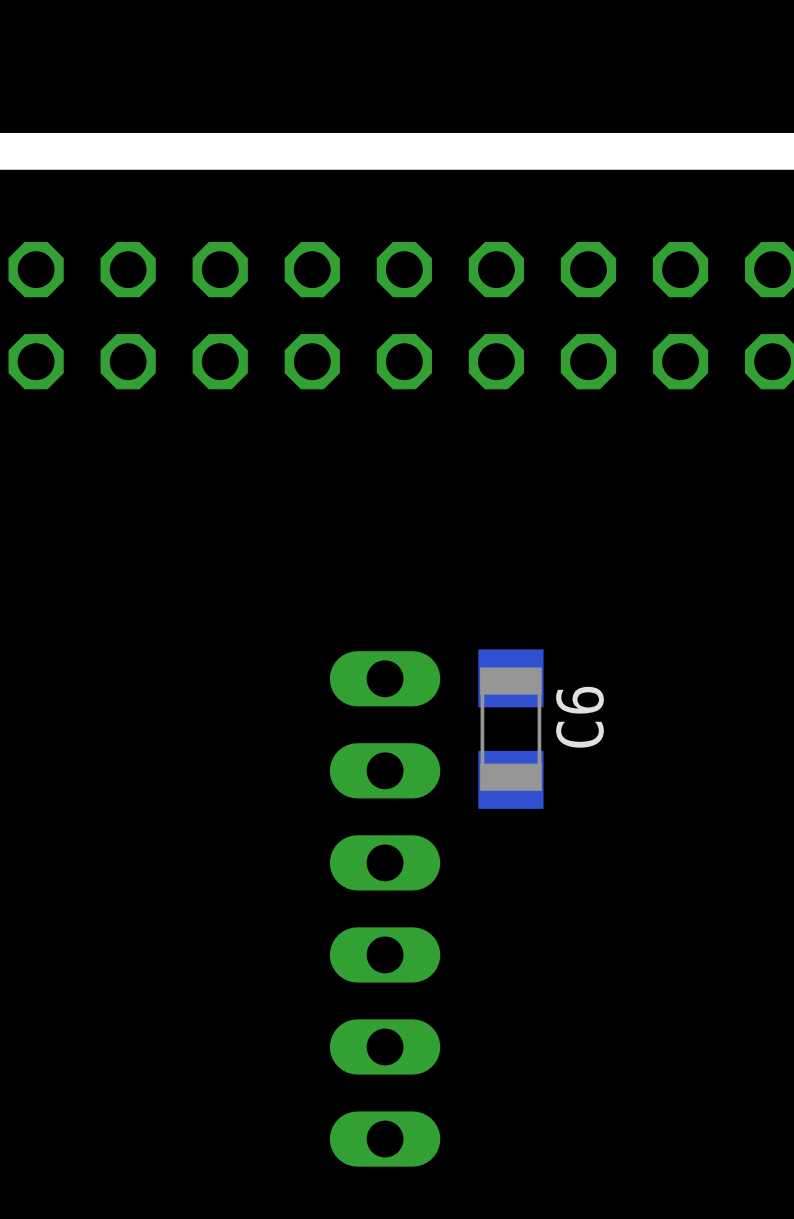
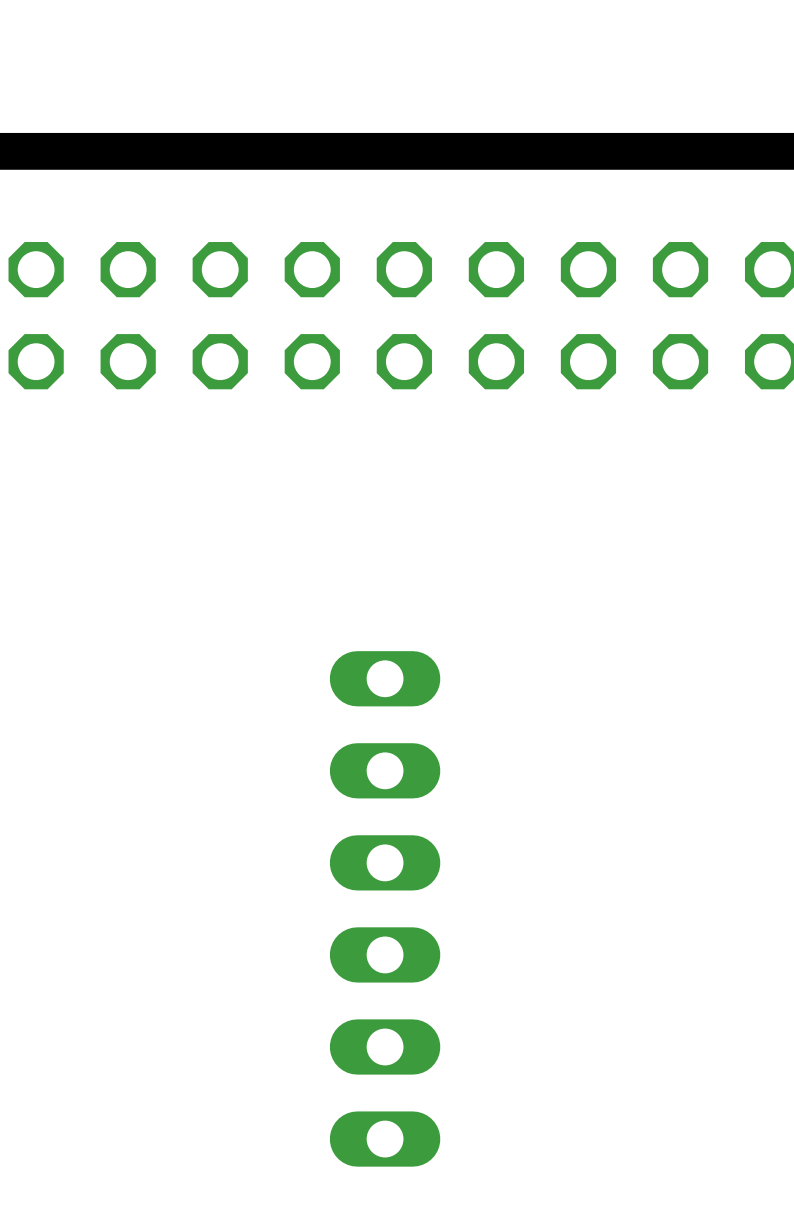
C6: (510, 729) -> none

